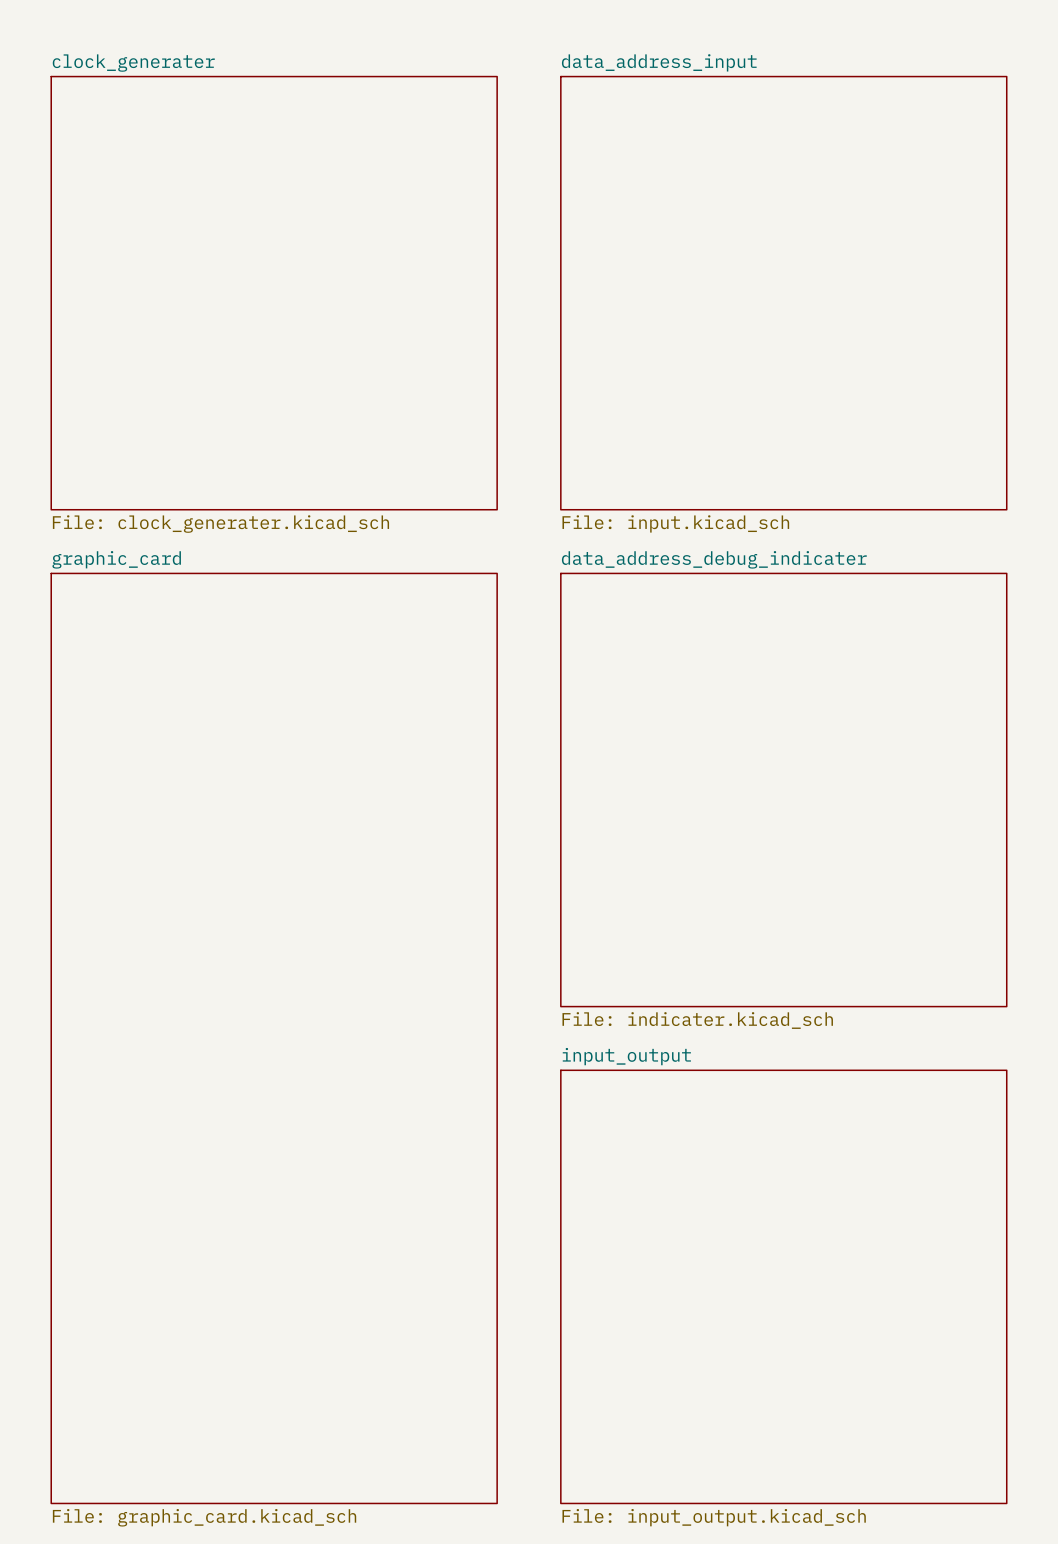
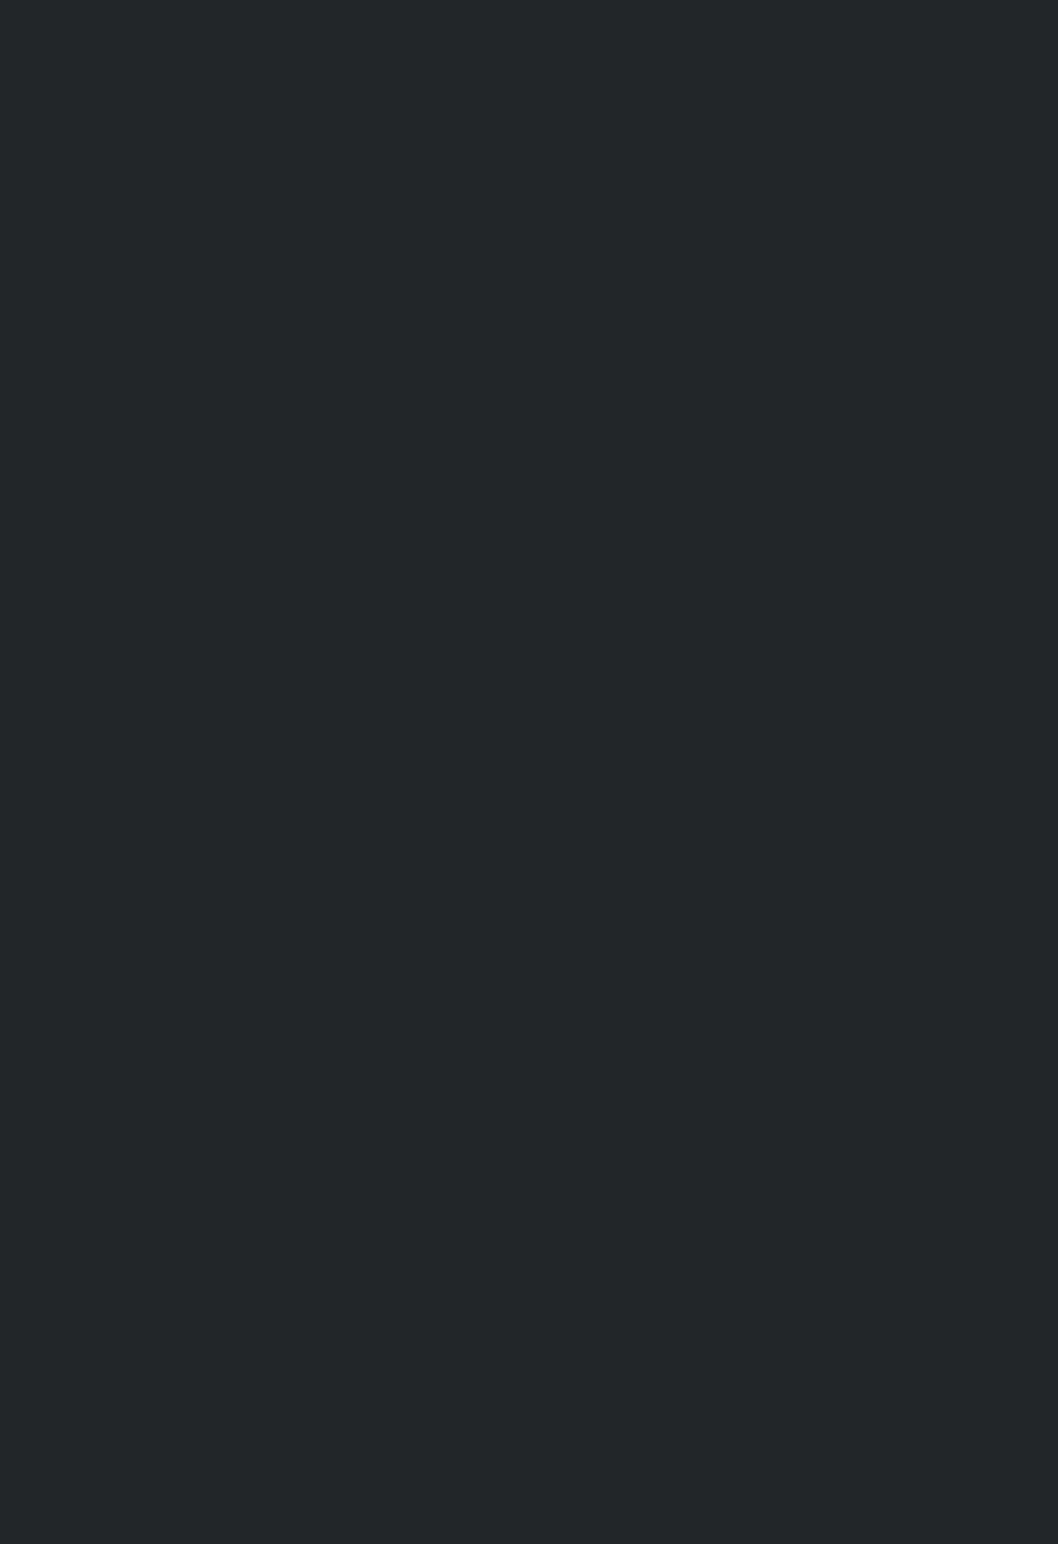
sheet clock_generater: File: clock_generater.kicad_sch (274, 293) -> none
sheet data_address_input: File: input.kicad_sch (783, 293) -> none
sheet data_address_debug_indicater: File: indicater.kicad_sch (783, 790) -> none
sheet graphic_card: File: graphic_card.kicad_sch (274, 1038) -> none
sheet input_output: File: input_output.kicad_sch (783, 1286) -> none

